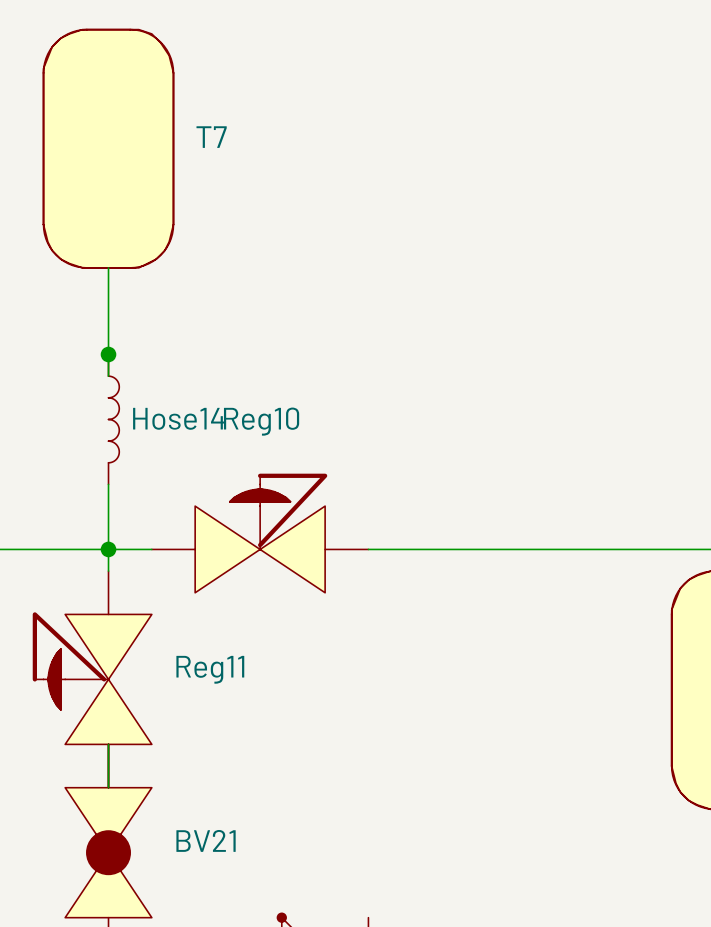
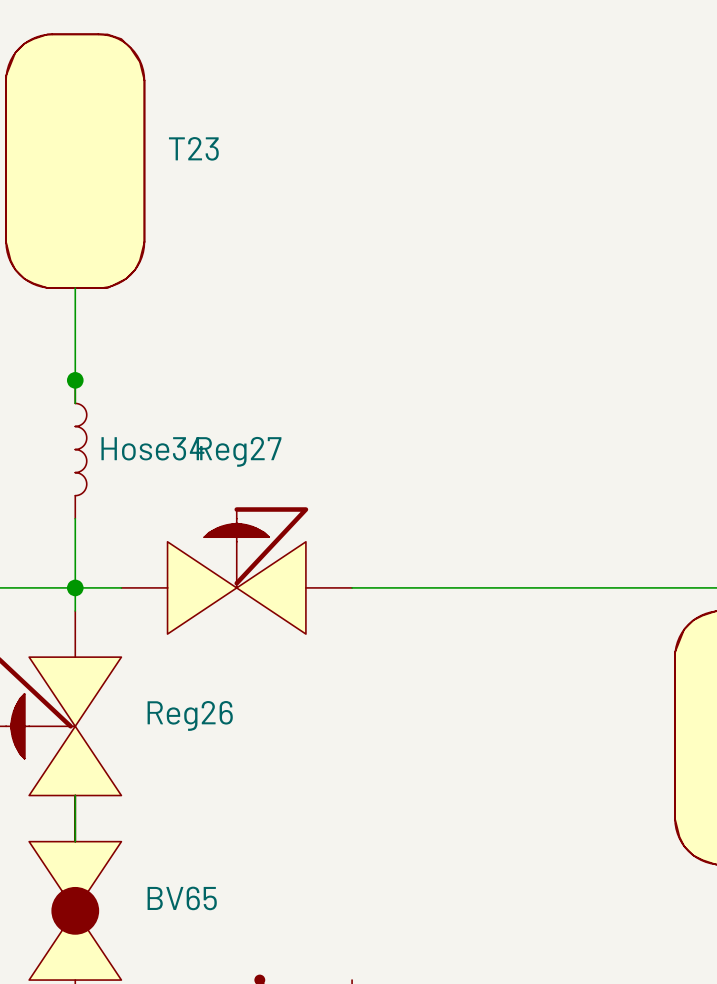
T7 name: T7 (211, 137) -> T23 (193, 148)
Hose14 name: Hose14 (178, 418) -> Hose34 (152, 448)
Reg10 name: Reg10 (261, 421) -> Reg27 (239, 451)
Reg11 name: Reg11 (210, 669) -> Reg26 (190, 715)
BV21 name: BV21 (206, 840) -> BV65 (182, 898)

